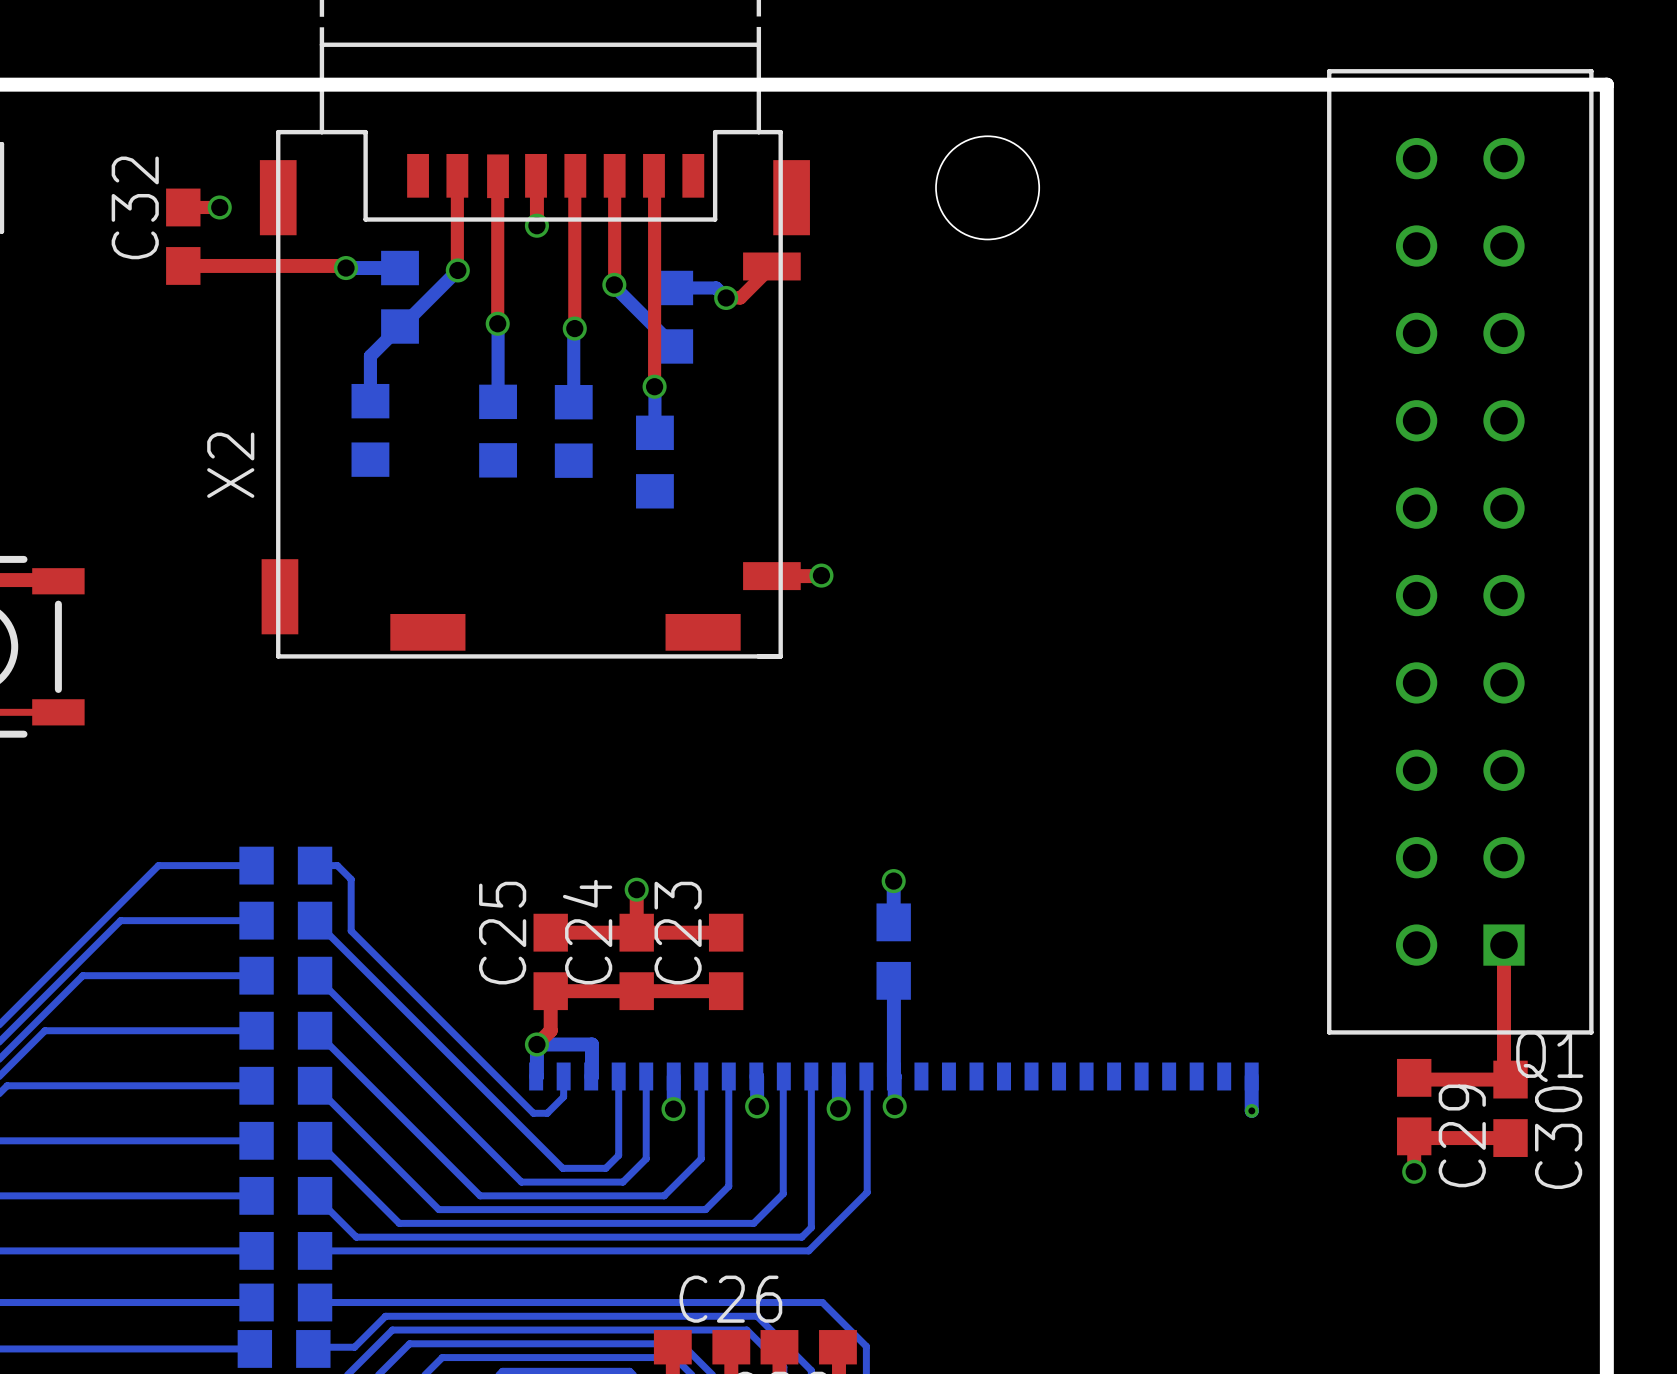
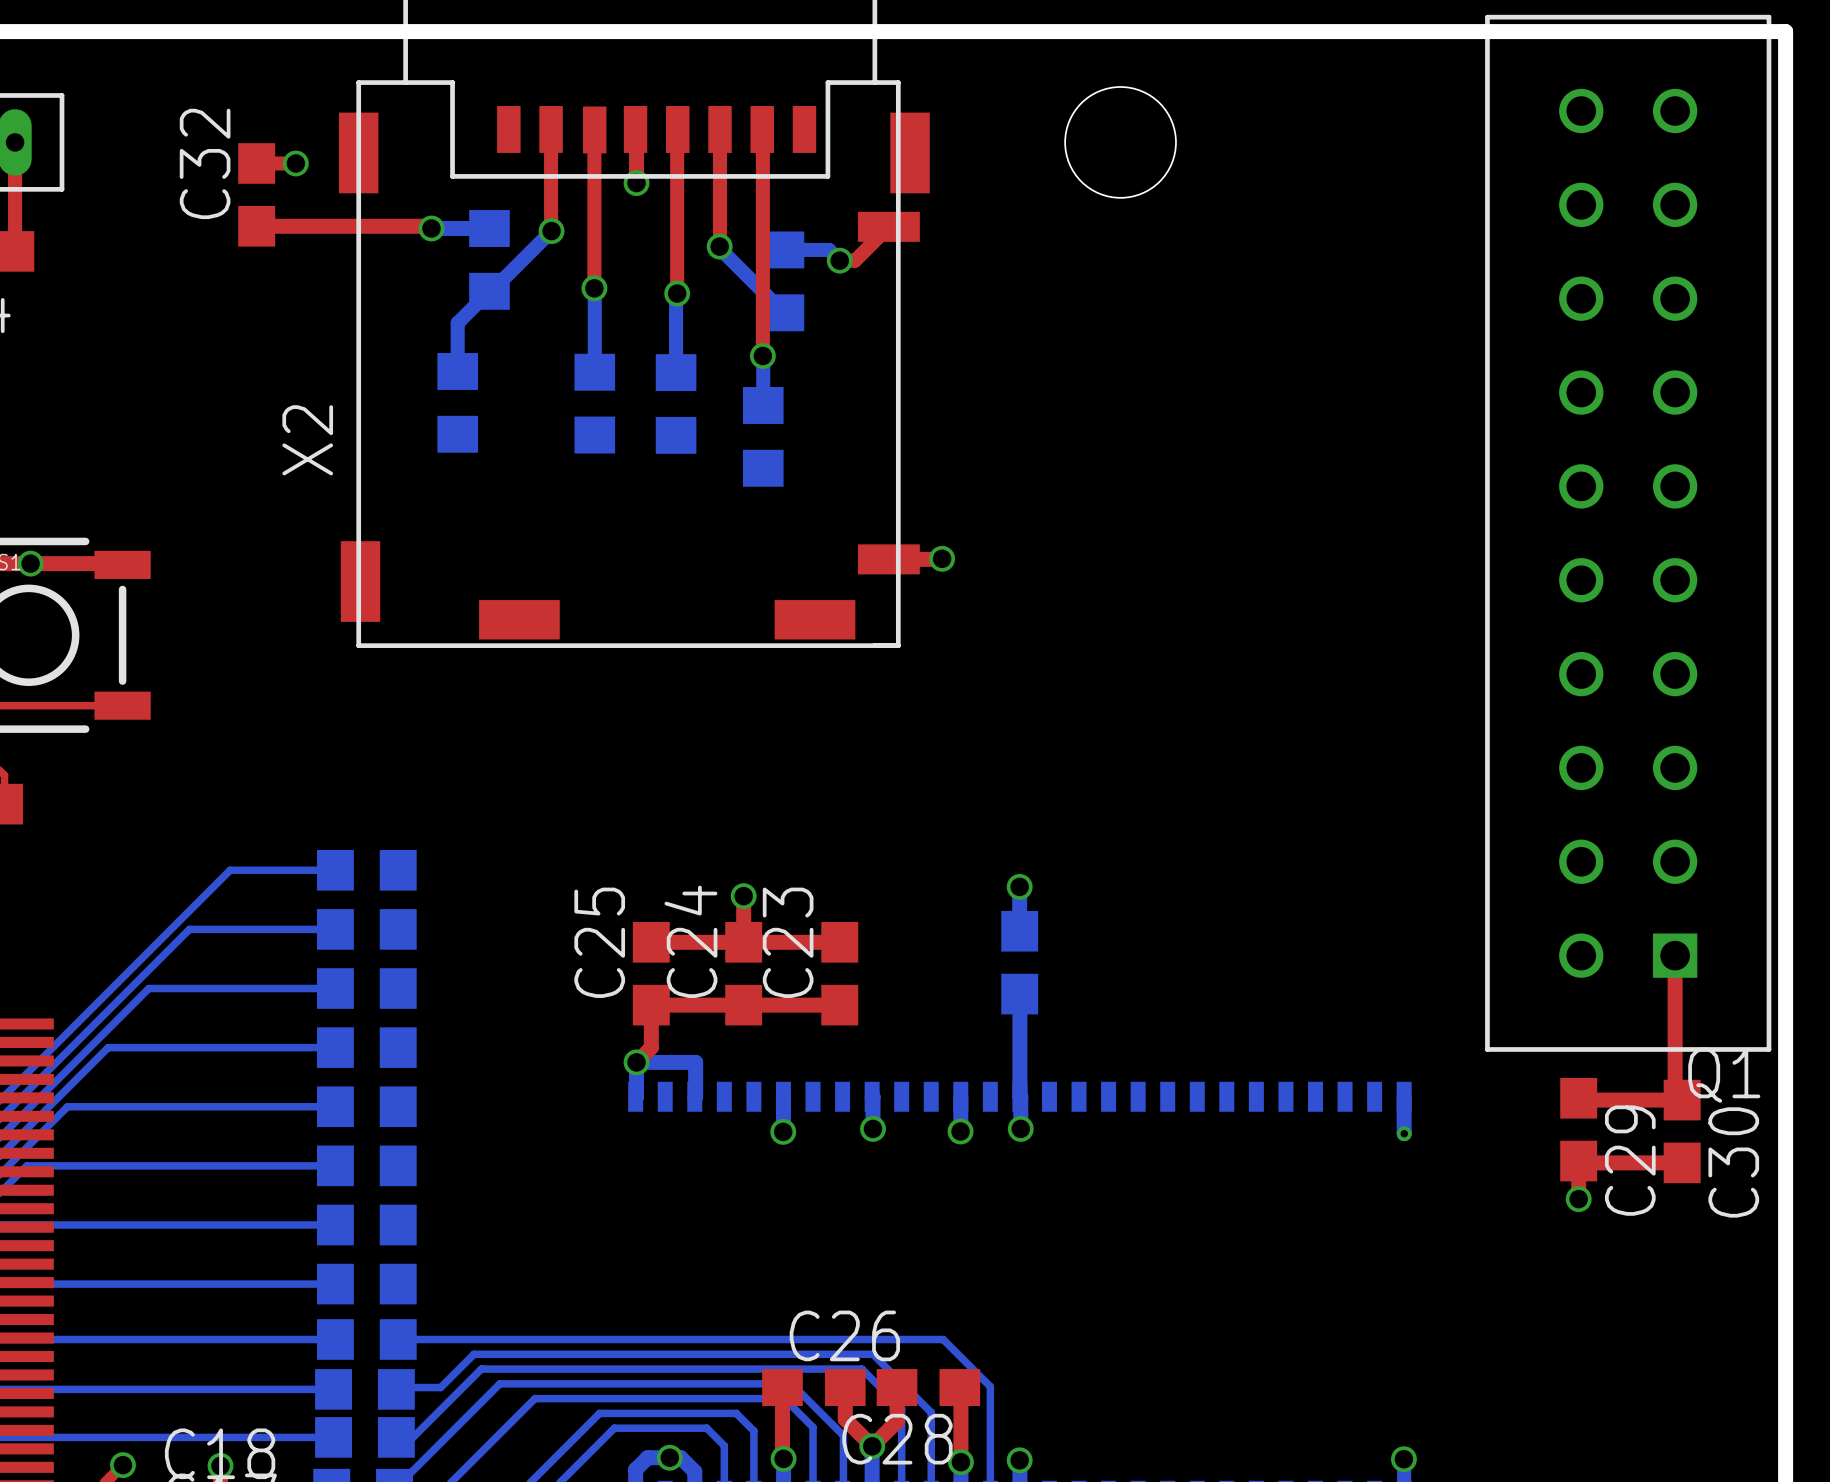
bottom track: (315, 865) (337, 865) (351, 879) (351, 930) (533, 1113) (547, 1113) (563, 1096) (563, 1076) -> none
bottom track: (315, 920) (562, 1168) (605, 1168) (618, 1155) (618, 1076) -> none
bottom track: (315, 975) (521, 1182) (622, 1182) (646, 1158) (646, 1076) -> none
bottom track: (315, 1030) (480, 1195) (664, 1195) (701, 1158) (701, 1076) -> none
bottom track: (728, 1076) (728, 1186) (705, 1209) (438, 1209) (315, 1085) -> none
bottom track: (783, 1076) (783, 1193) (753, 1223) (399, 1223) (315, 1140) -> none
bottom track: (811, 1076) (811, 1227) (801, 1237) (356, 1237) (315, 1195) -> none
bottom track: (867, 1077) (867, 1192) (808, 1250) (315, 1250) -> none

